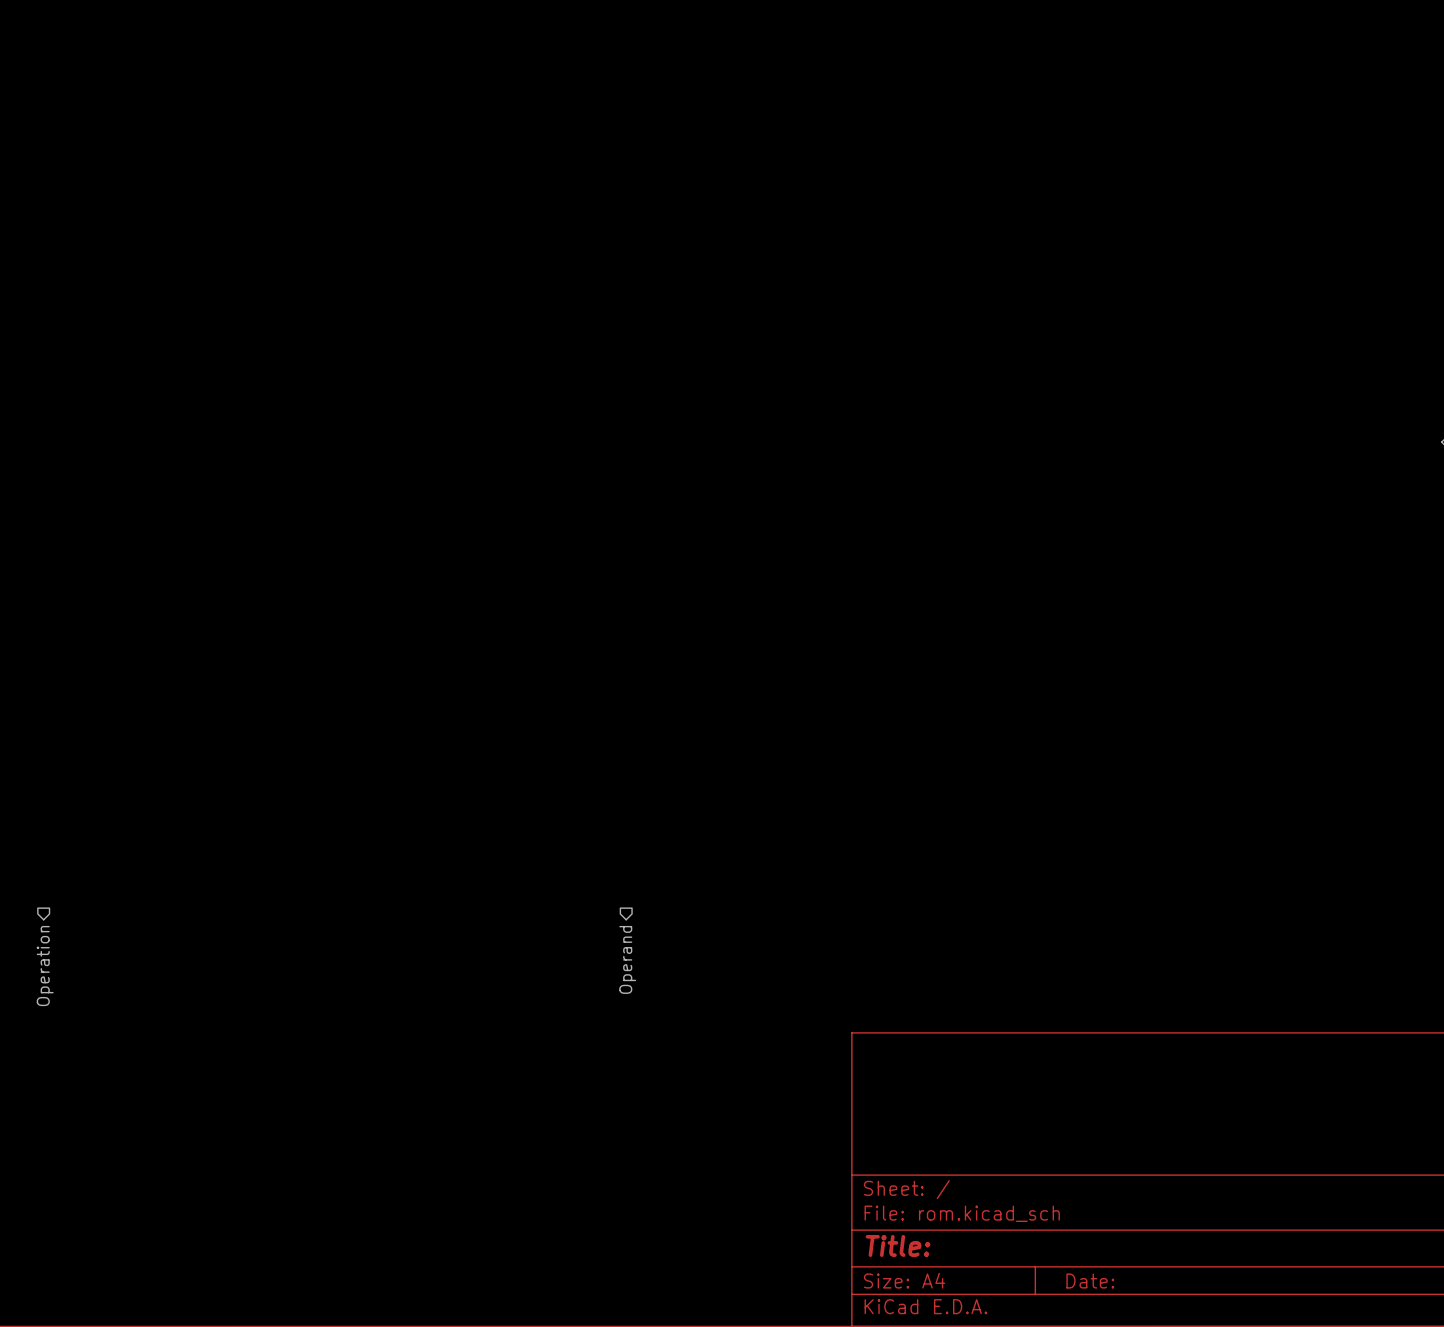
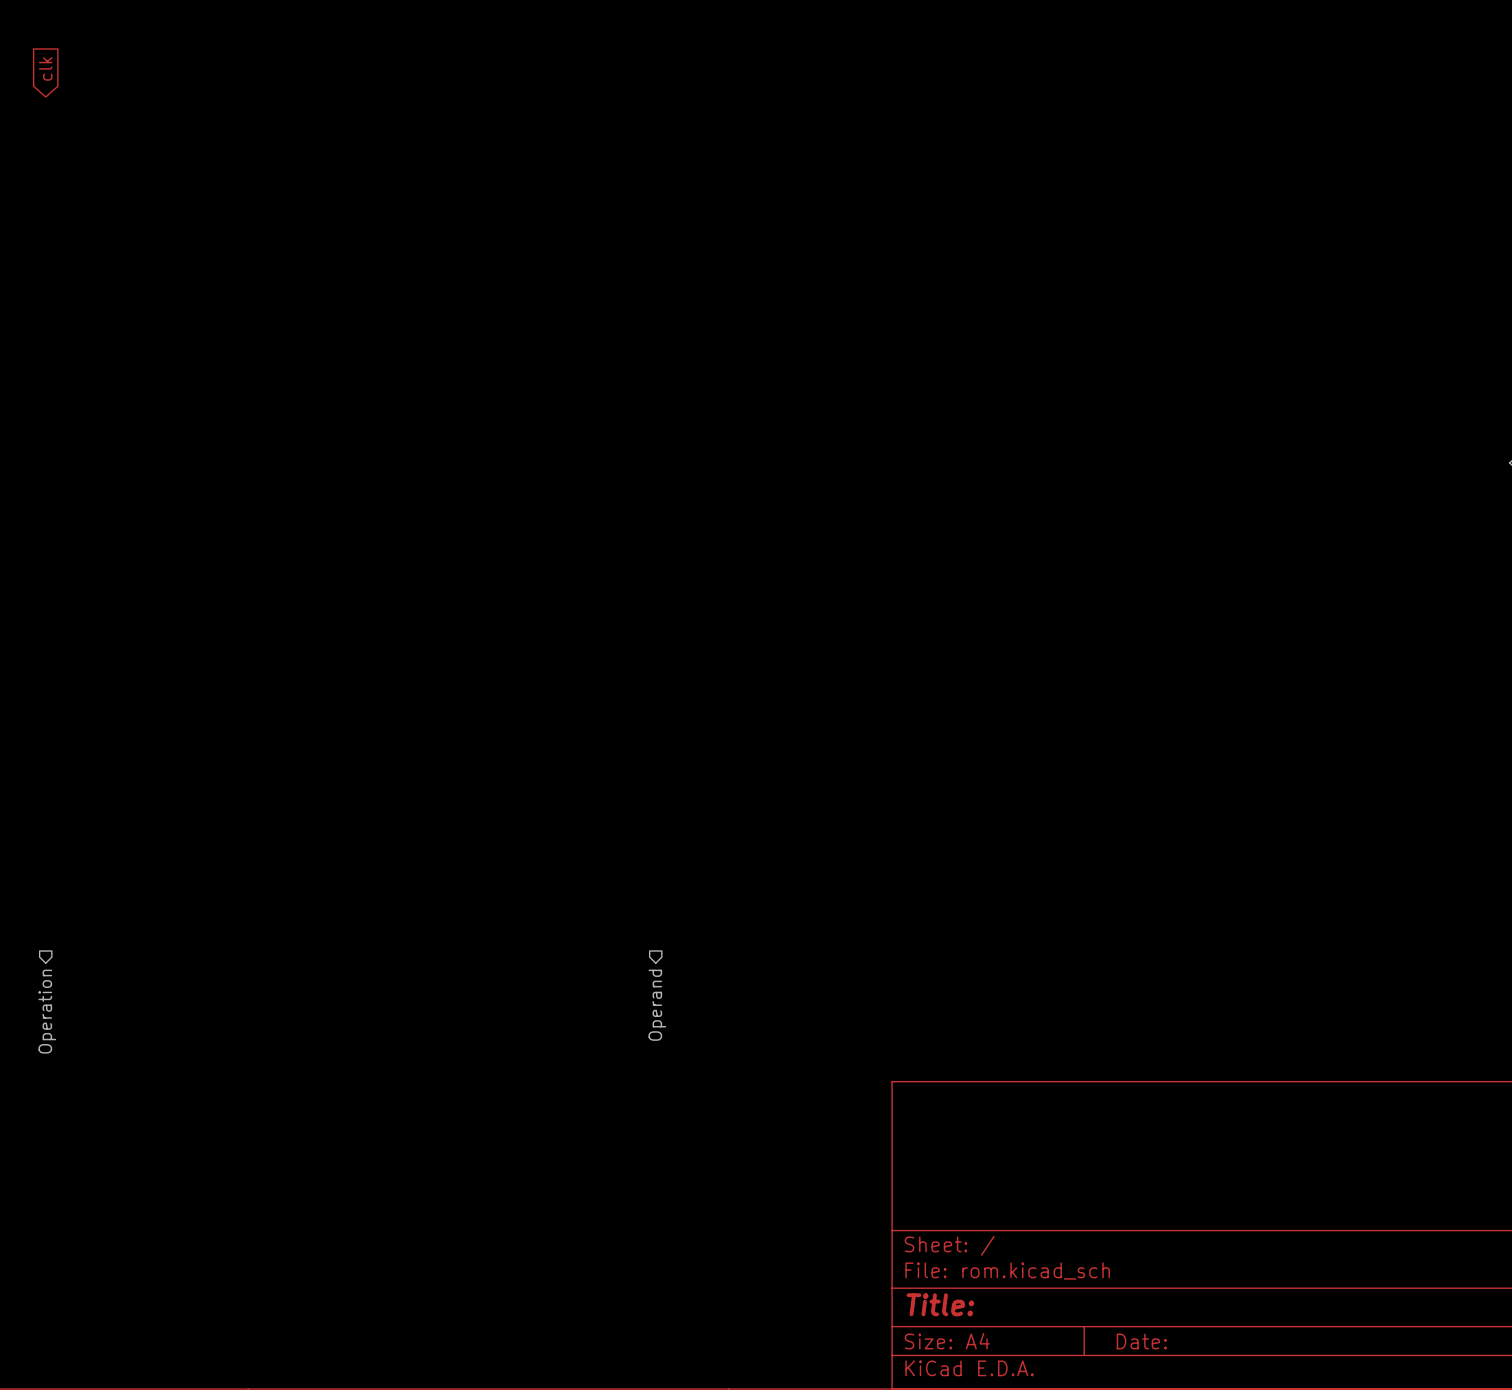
global label: none -> clk (45, 68)

